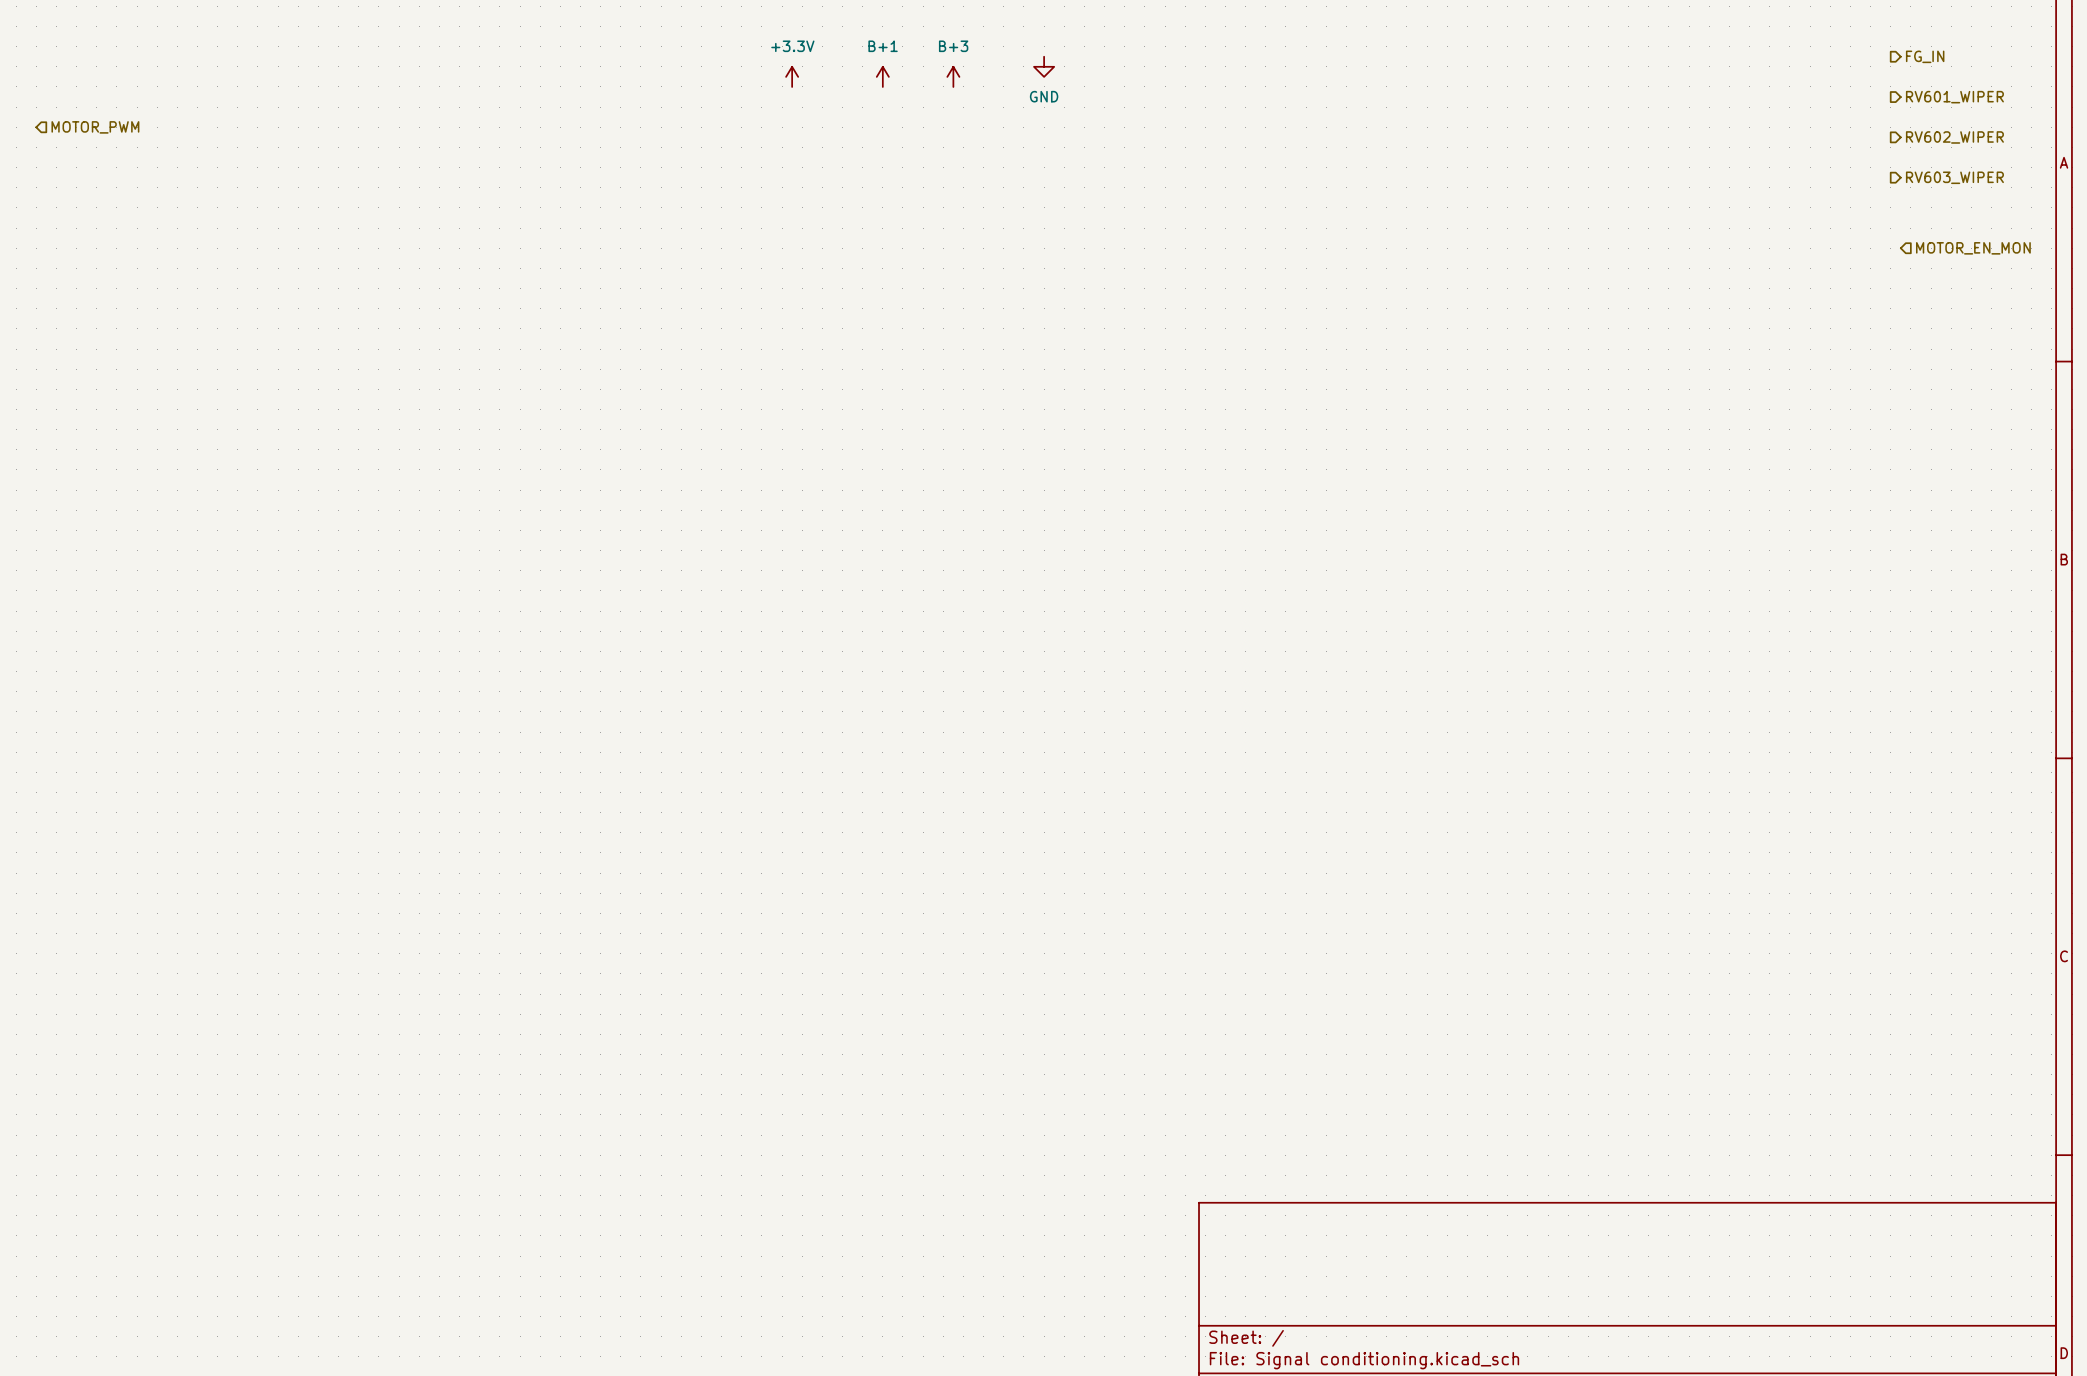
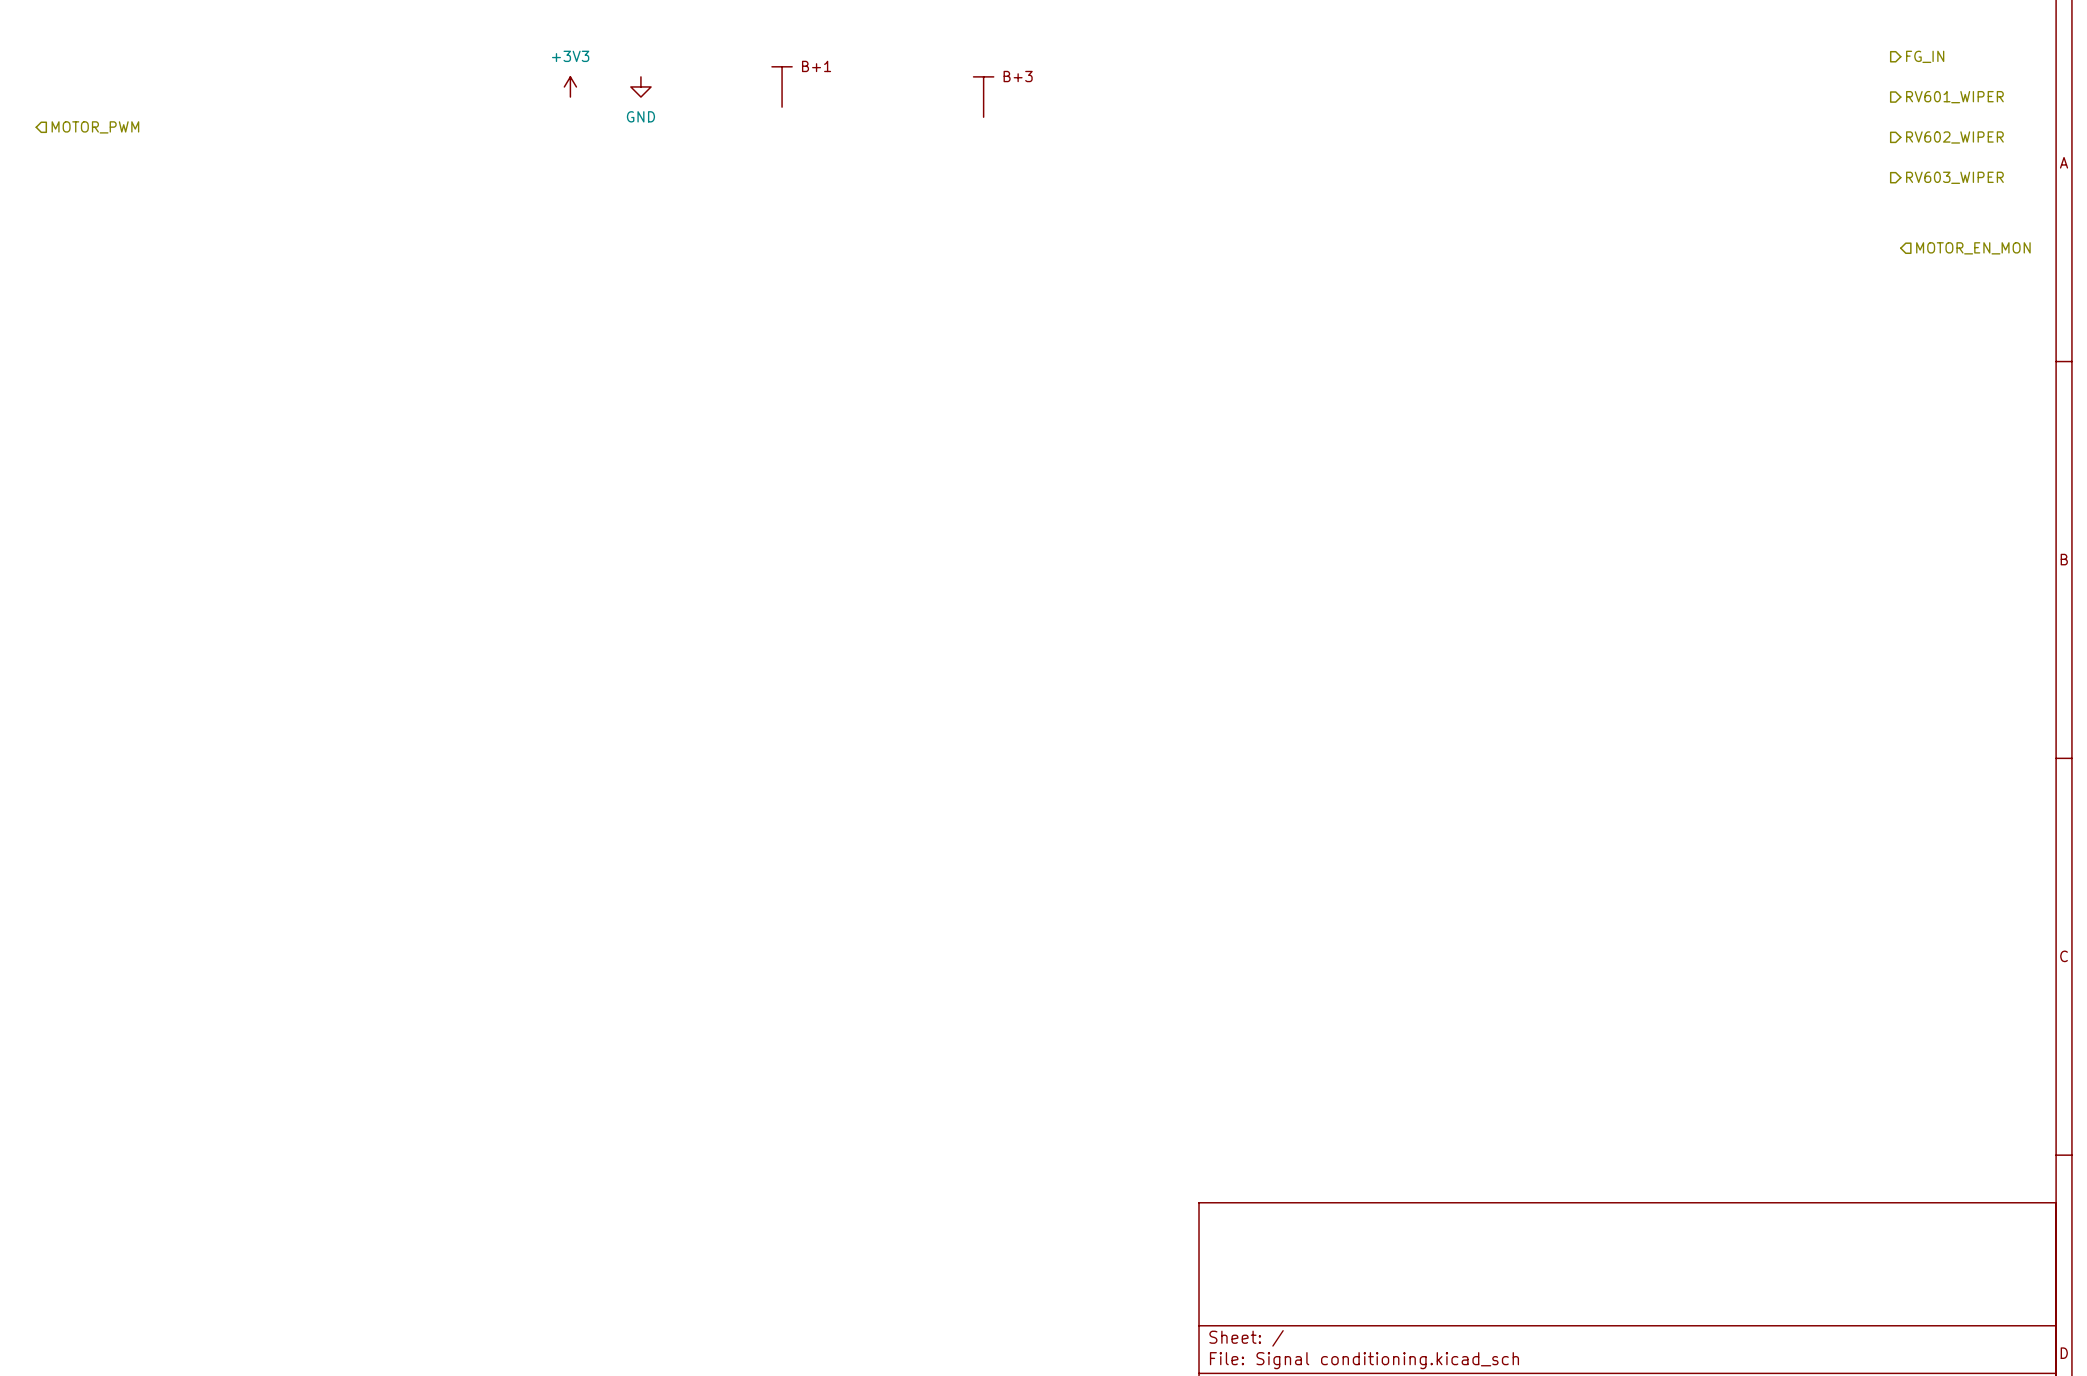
power symbol: GND (1044, 66) -> none
power symbol: +3.3V (792, 76) -> none
power symbol: B+1 (882, 76) -> none
power symbol: B+3 (953, 76) -> none
power symbol: none -> +3V3 (570, 86)
power symbol: none -> GND (640, 86)
power symbol: none -> (782, 86)
power symbol: none -> (983, 97)

